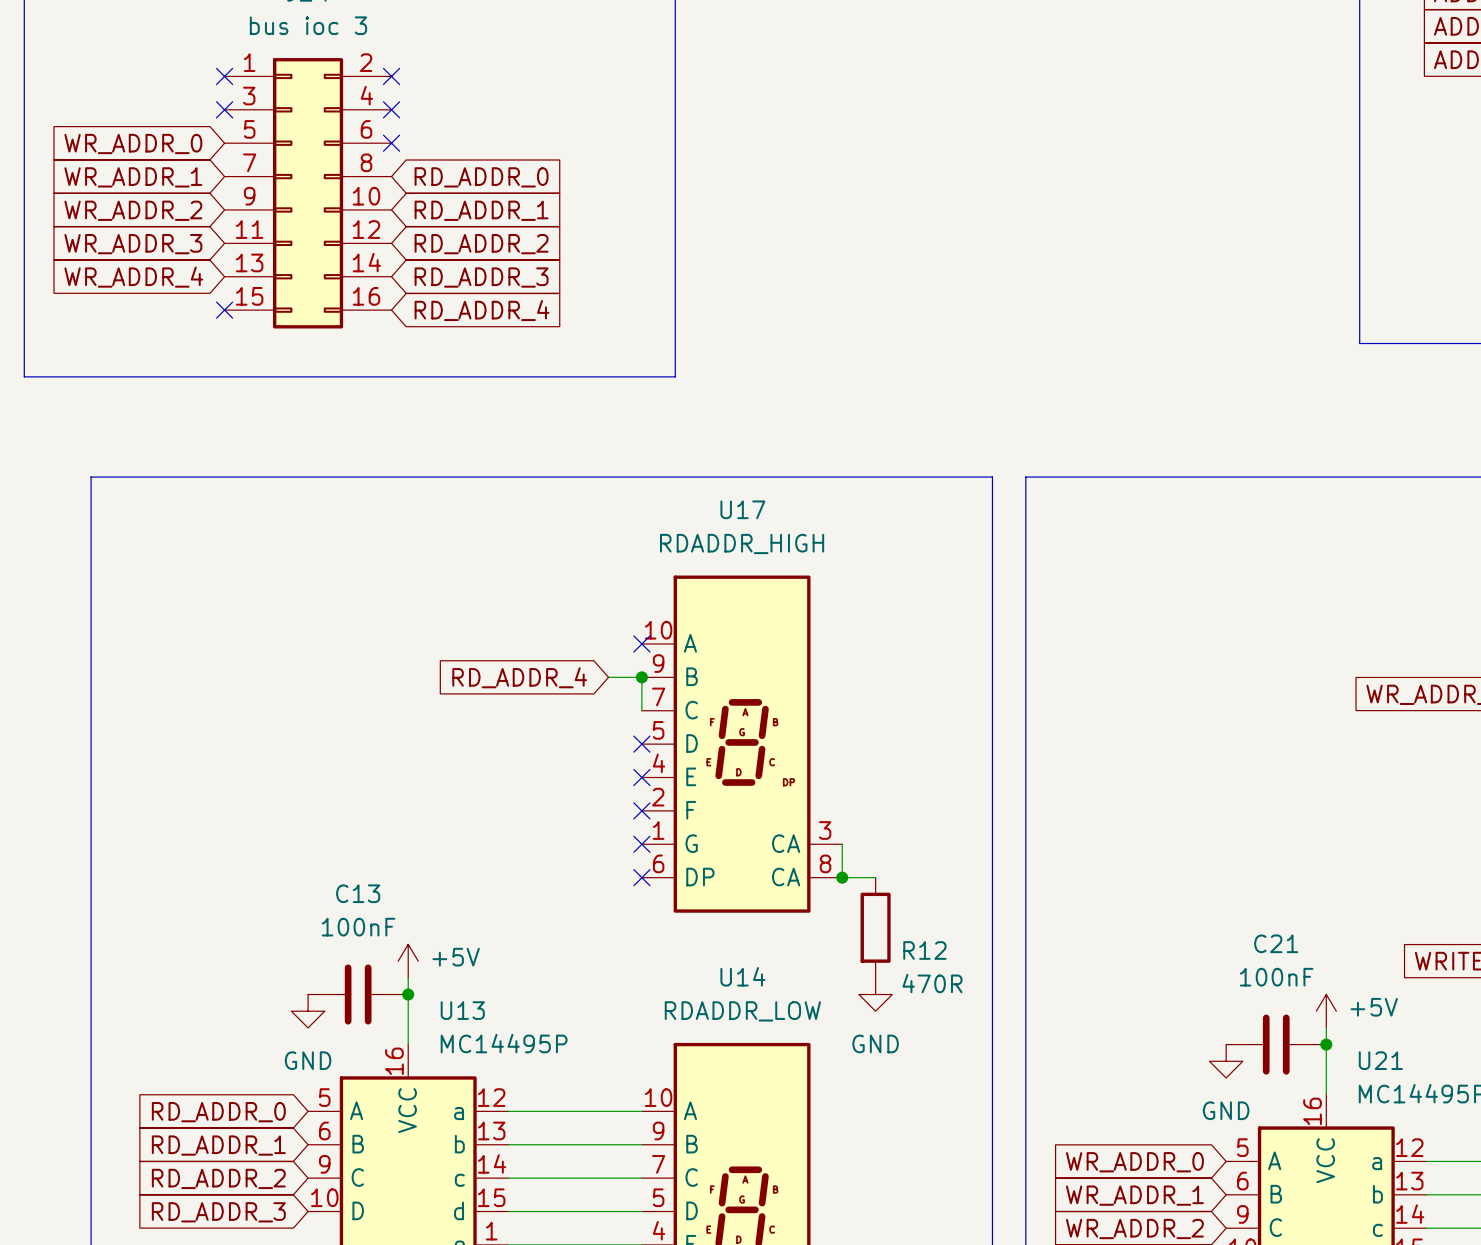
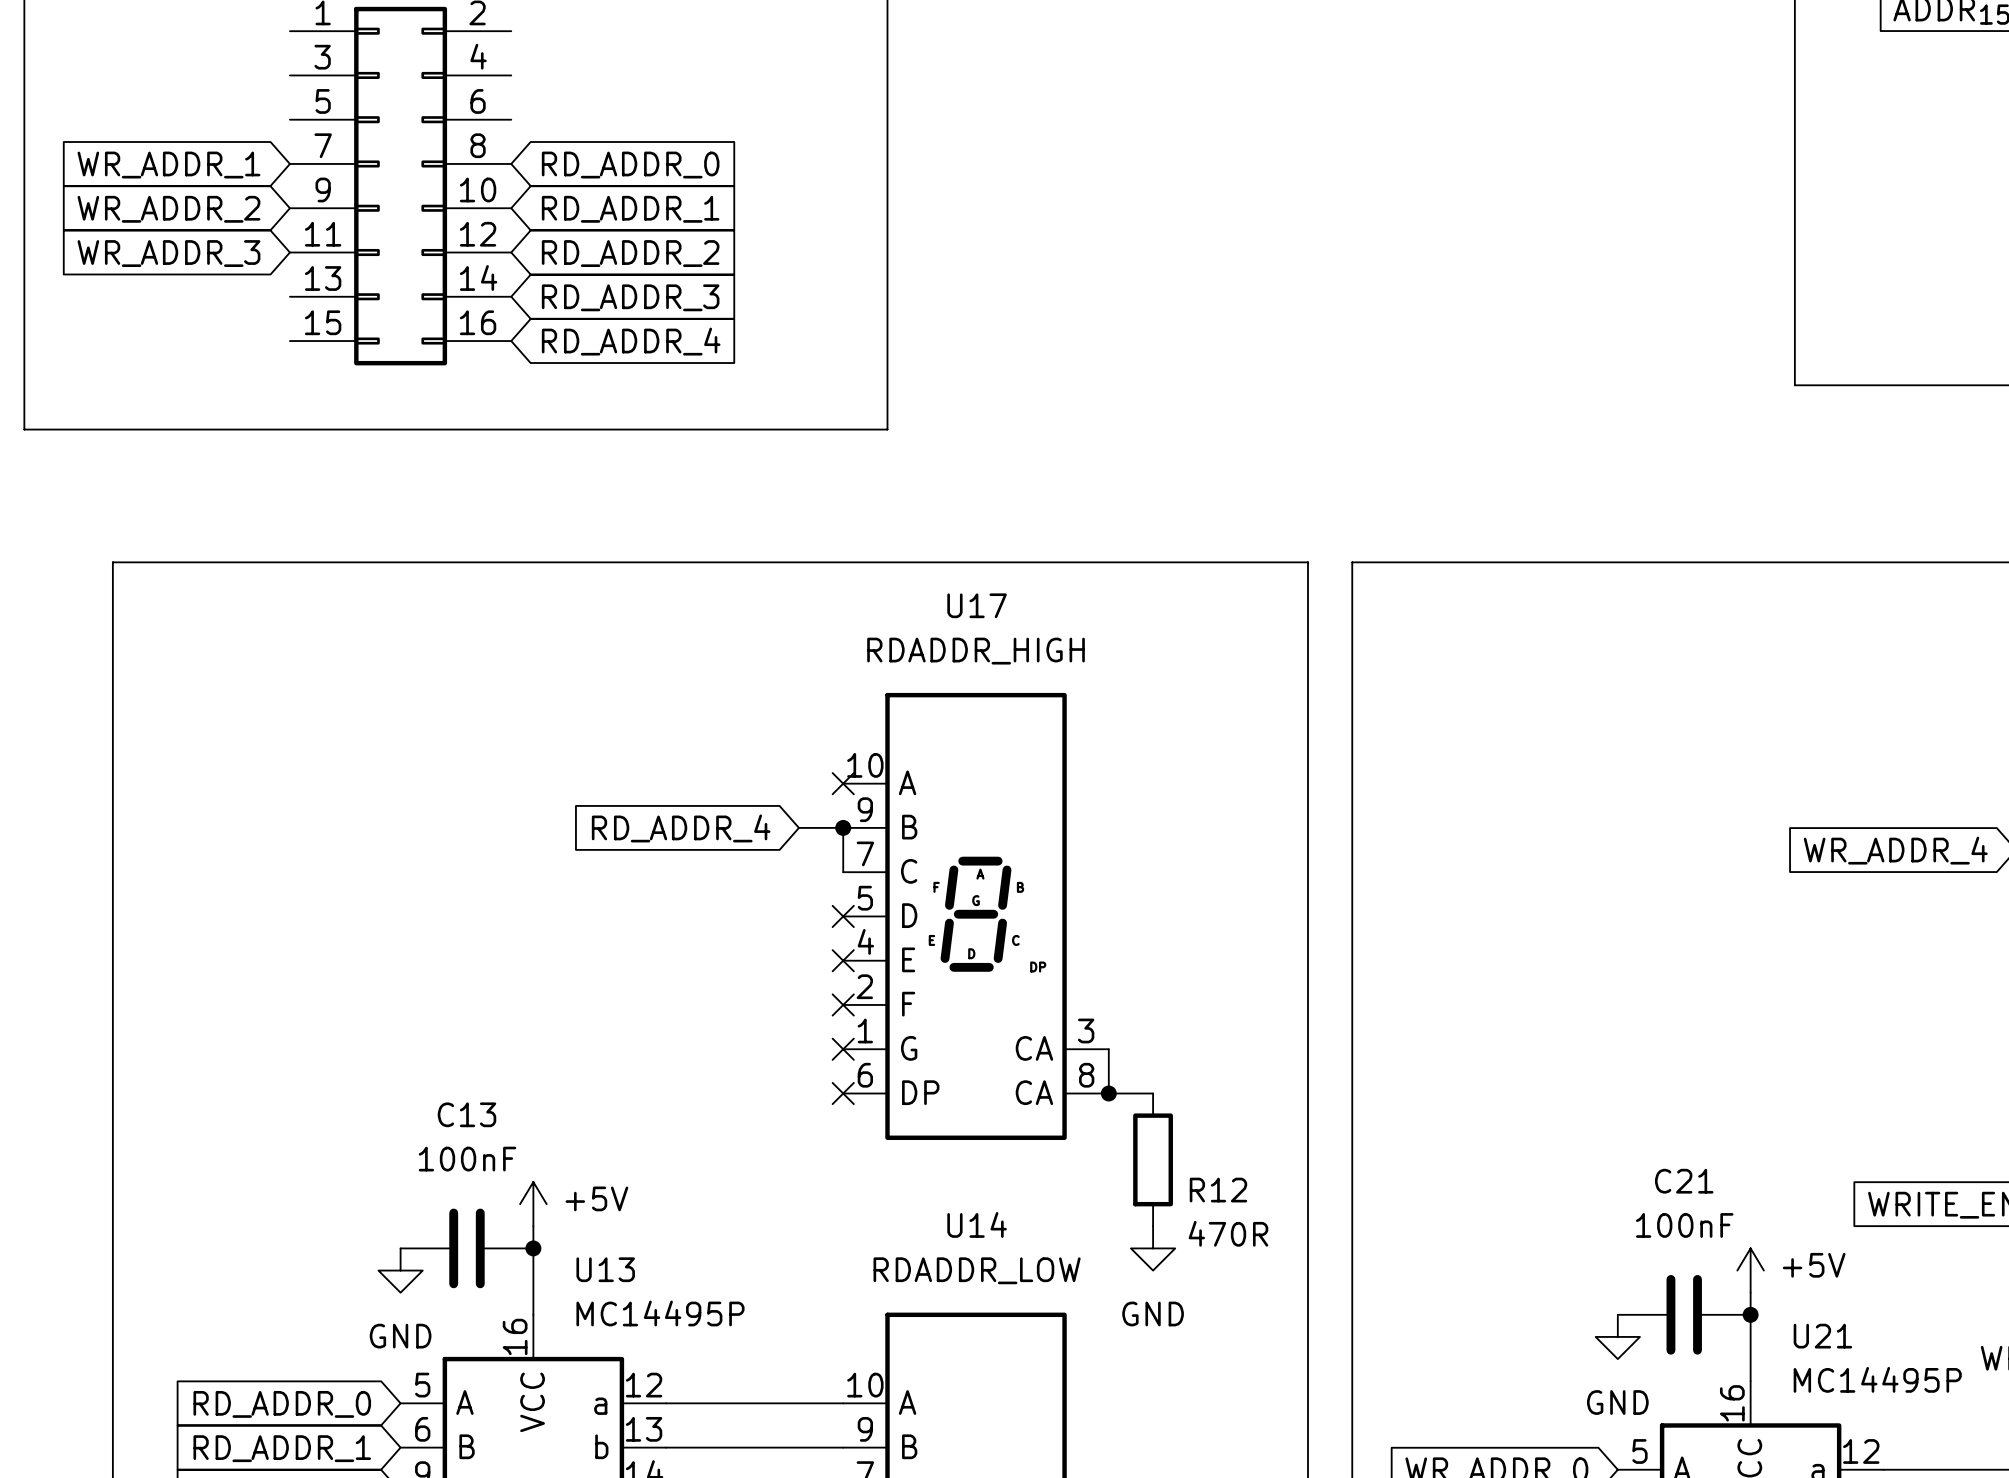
no-connect mark: (224, 76) -> none
no-connect mark: (391, 76) -> none
no-connect mark: (224, 109) -> none
no-connect mark: (391, 109) -> none
global label: WR_ADDR_0 (133, 143) -> none
no-connect mark: (391, 143) -> none
global label: WR_ADDR_4 (133, 277) -> none
no-connect mark: (224, 310) -> none

